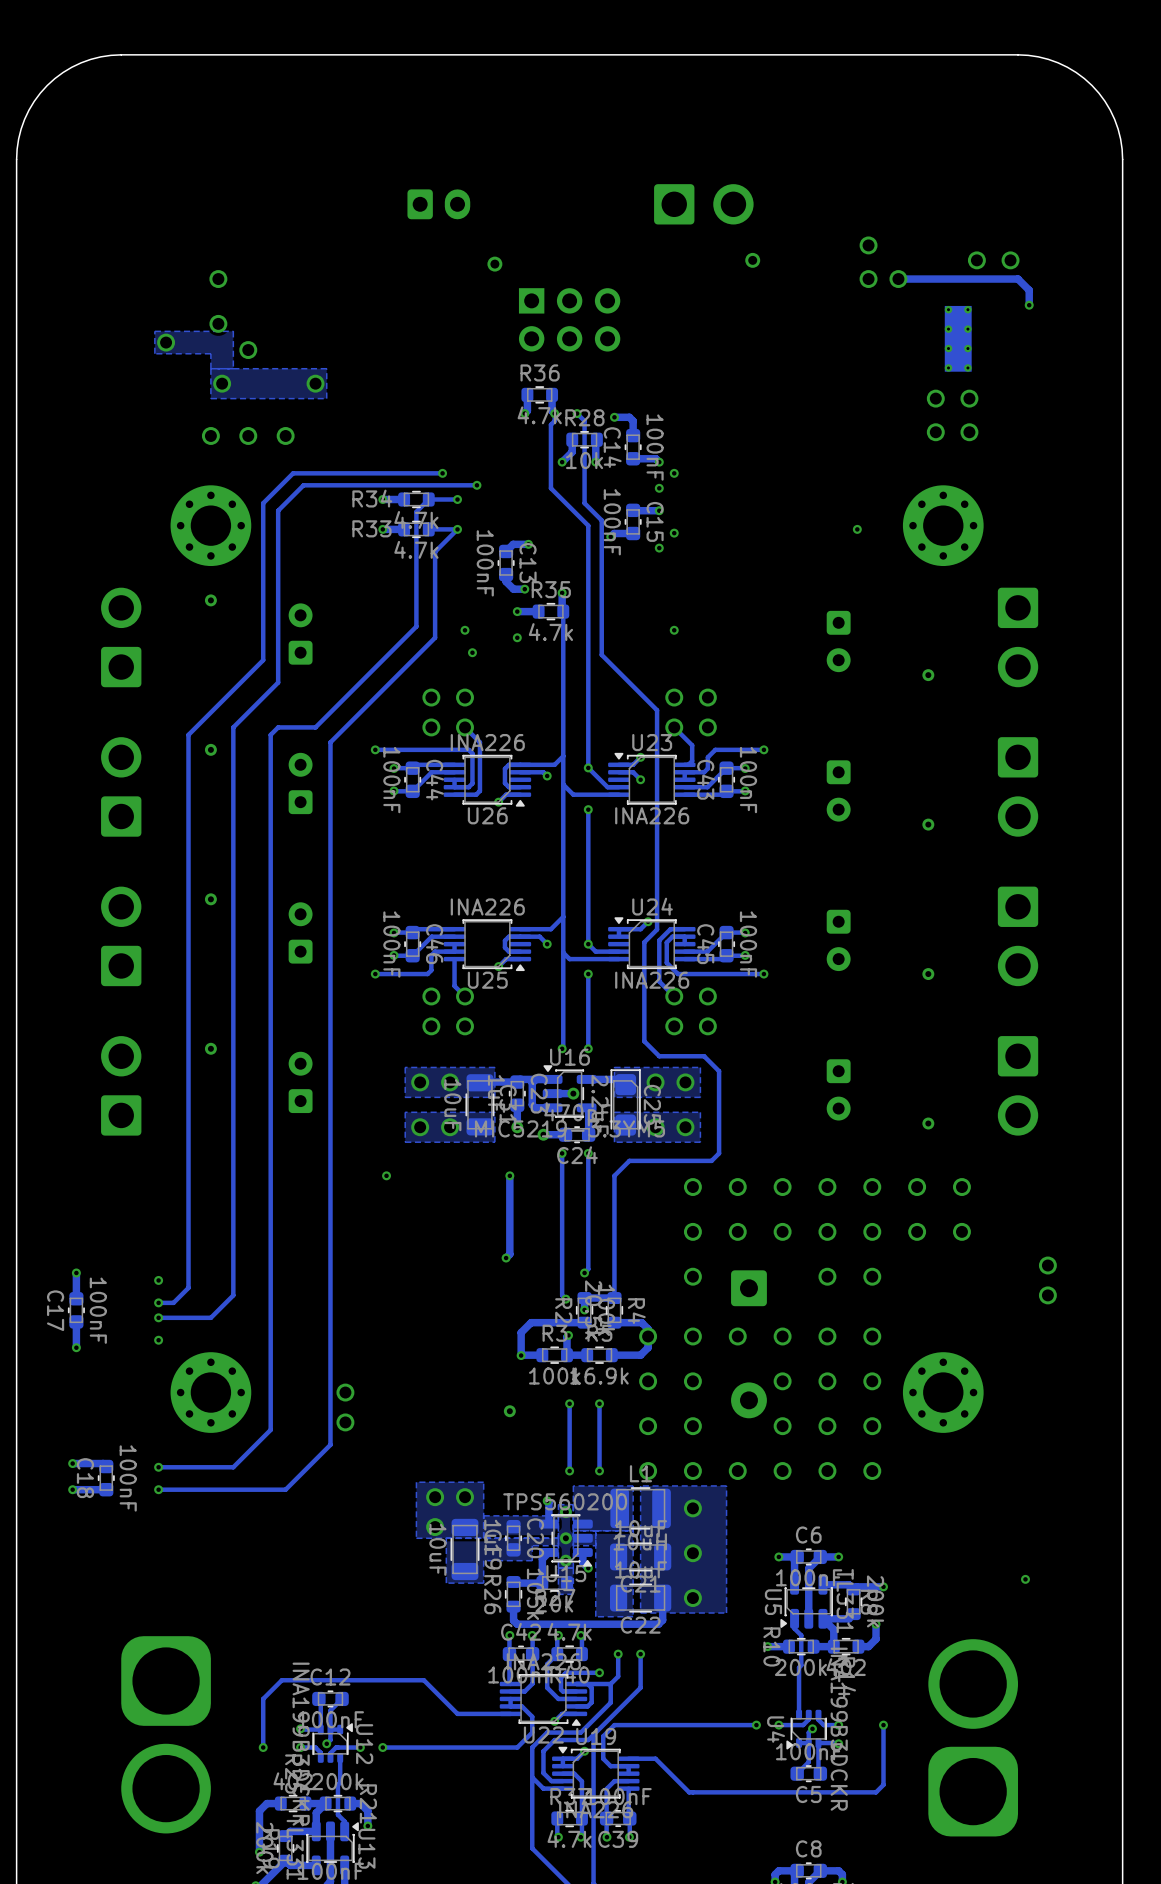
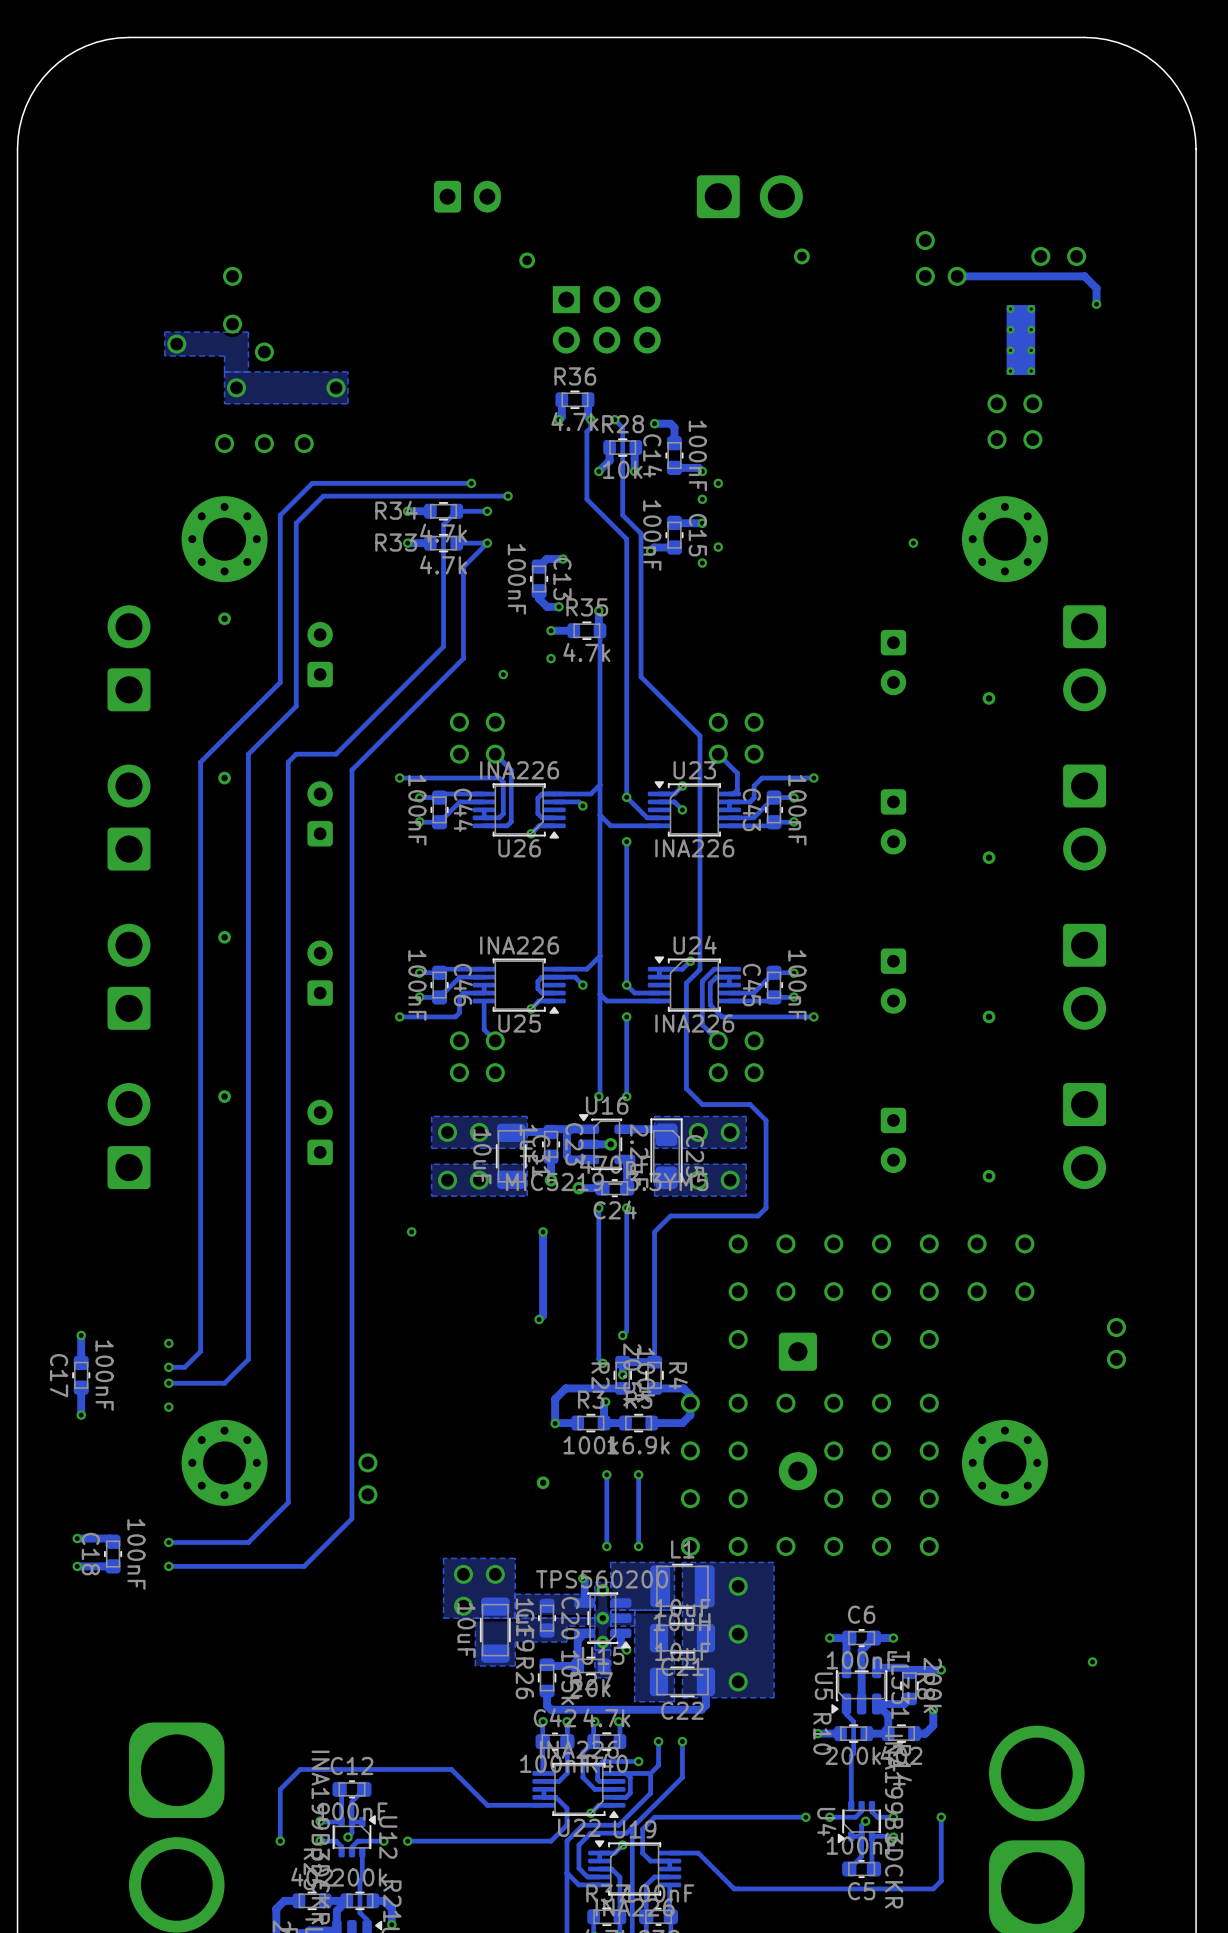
via: (465, 630) -> none
via: (674, 630) -> none

